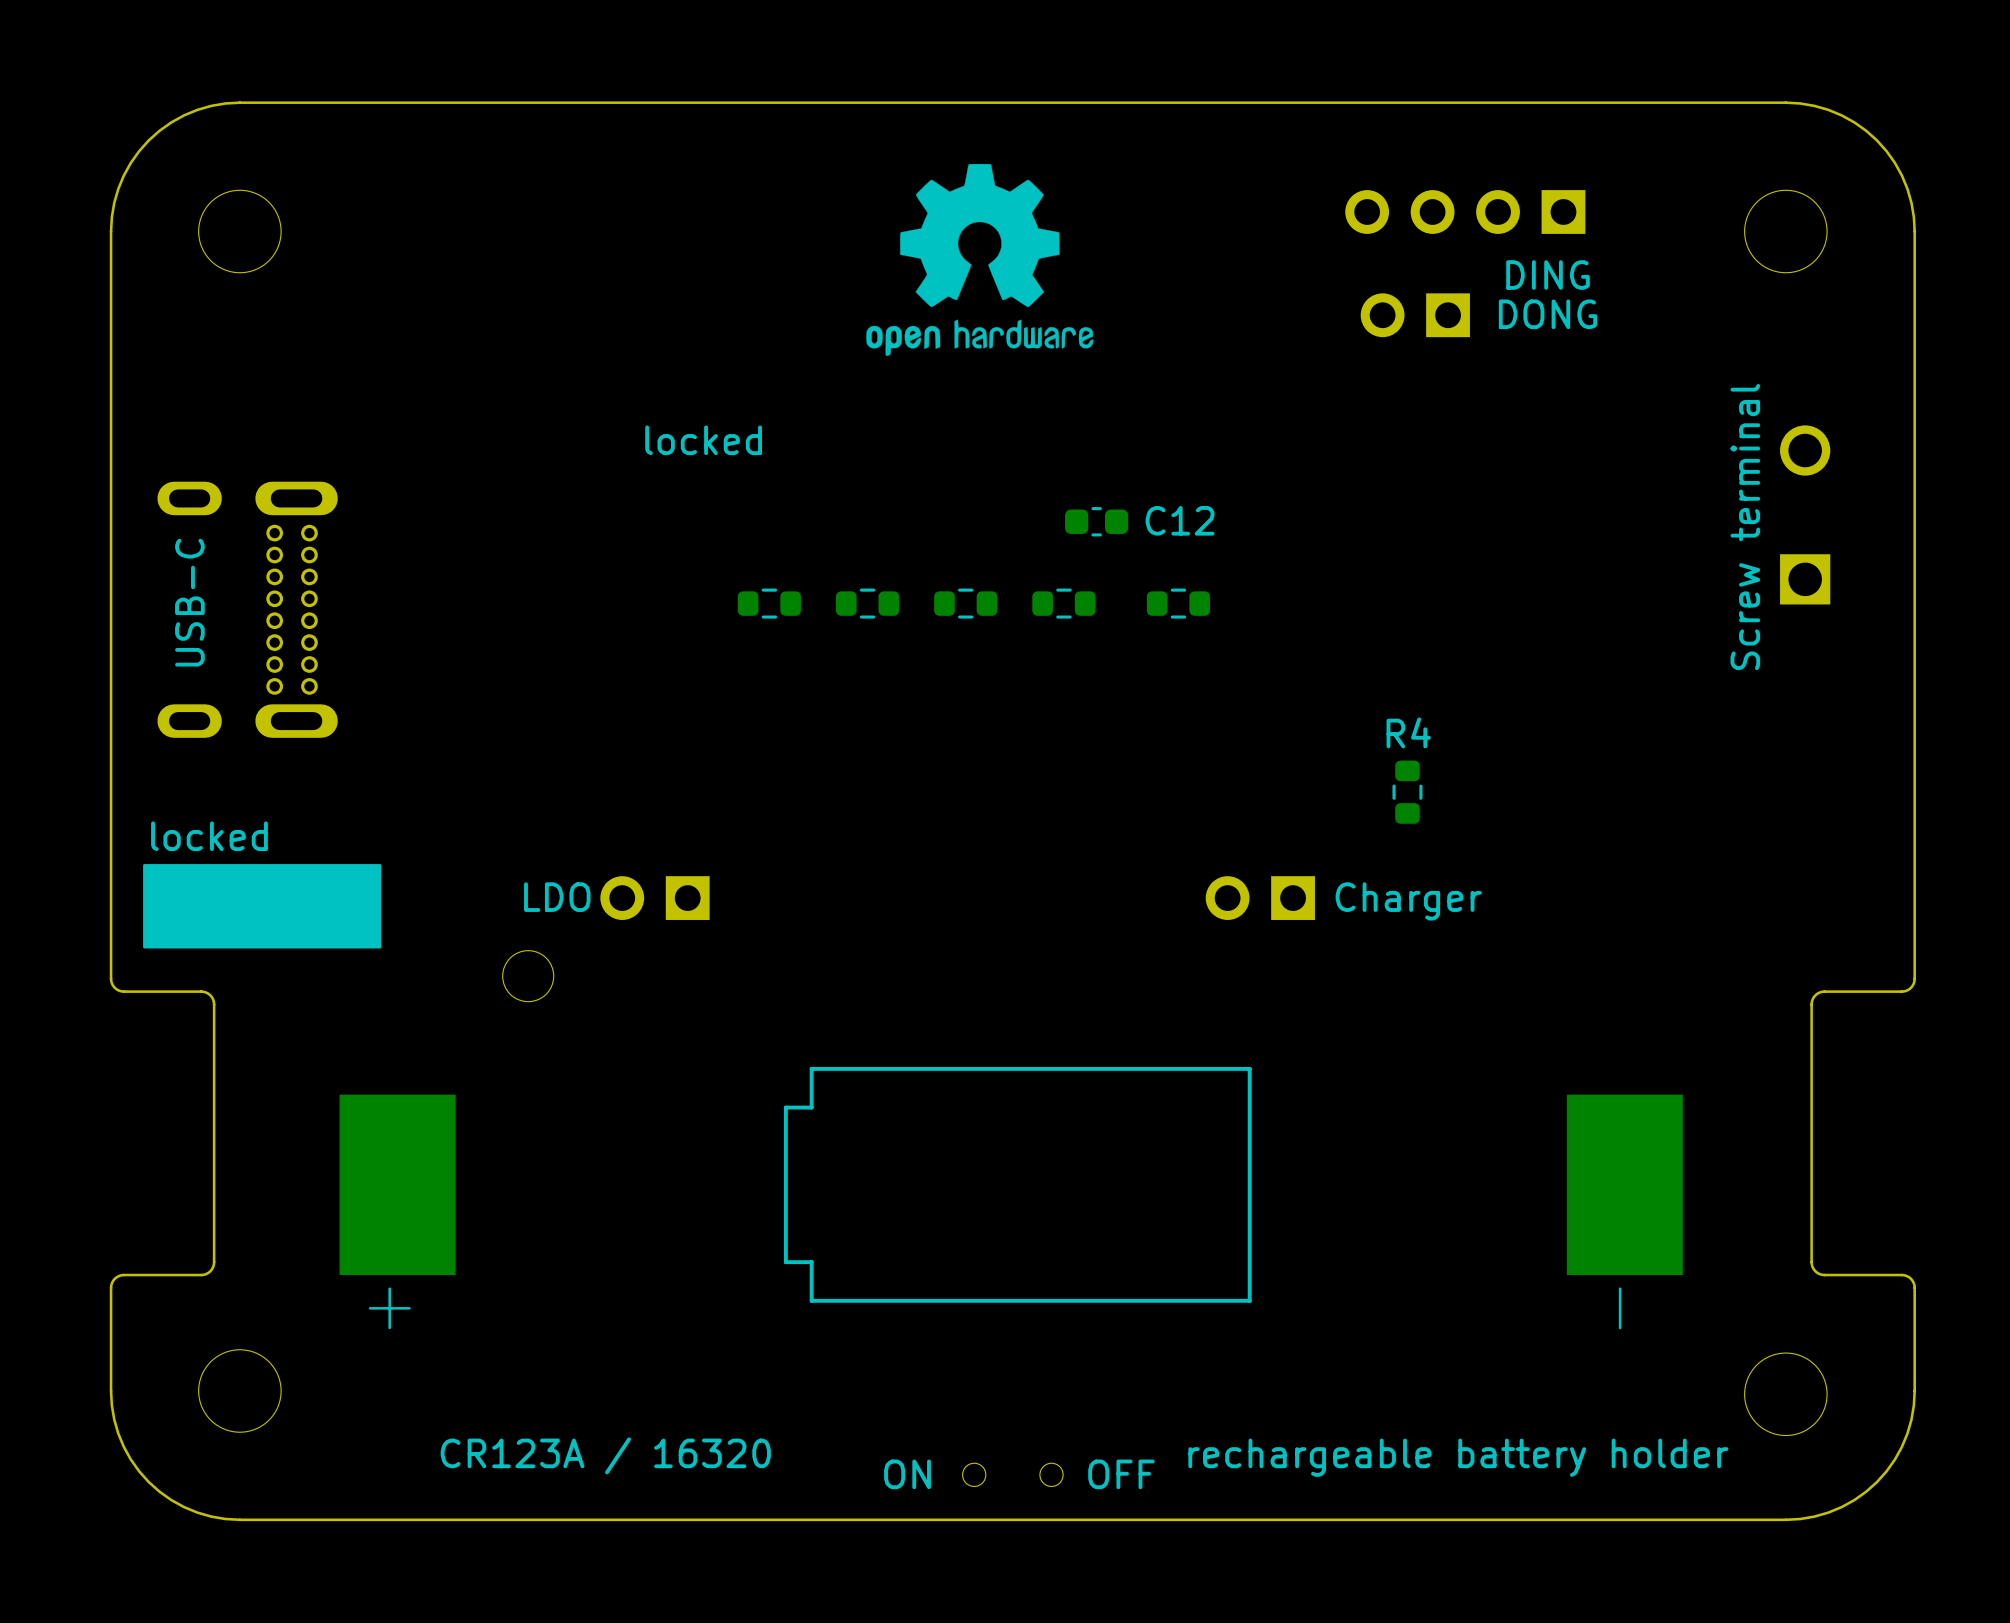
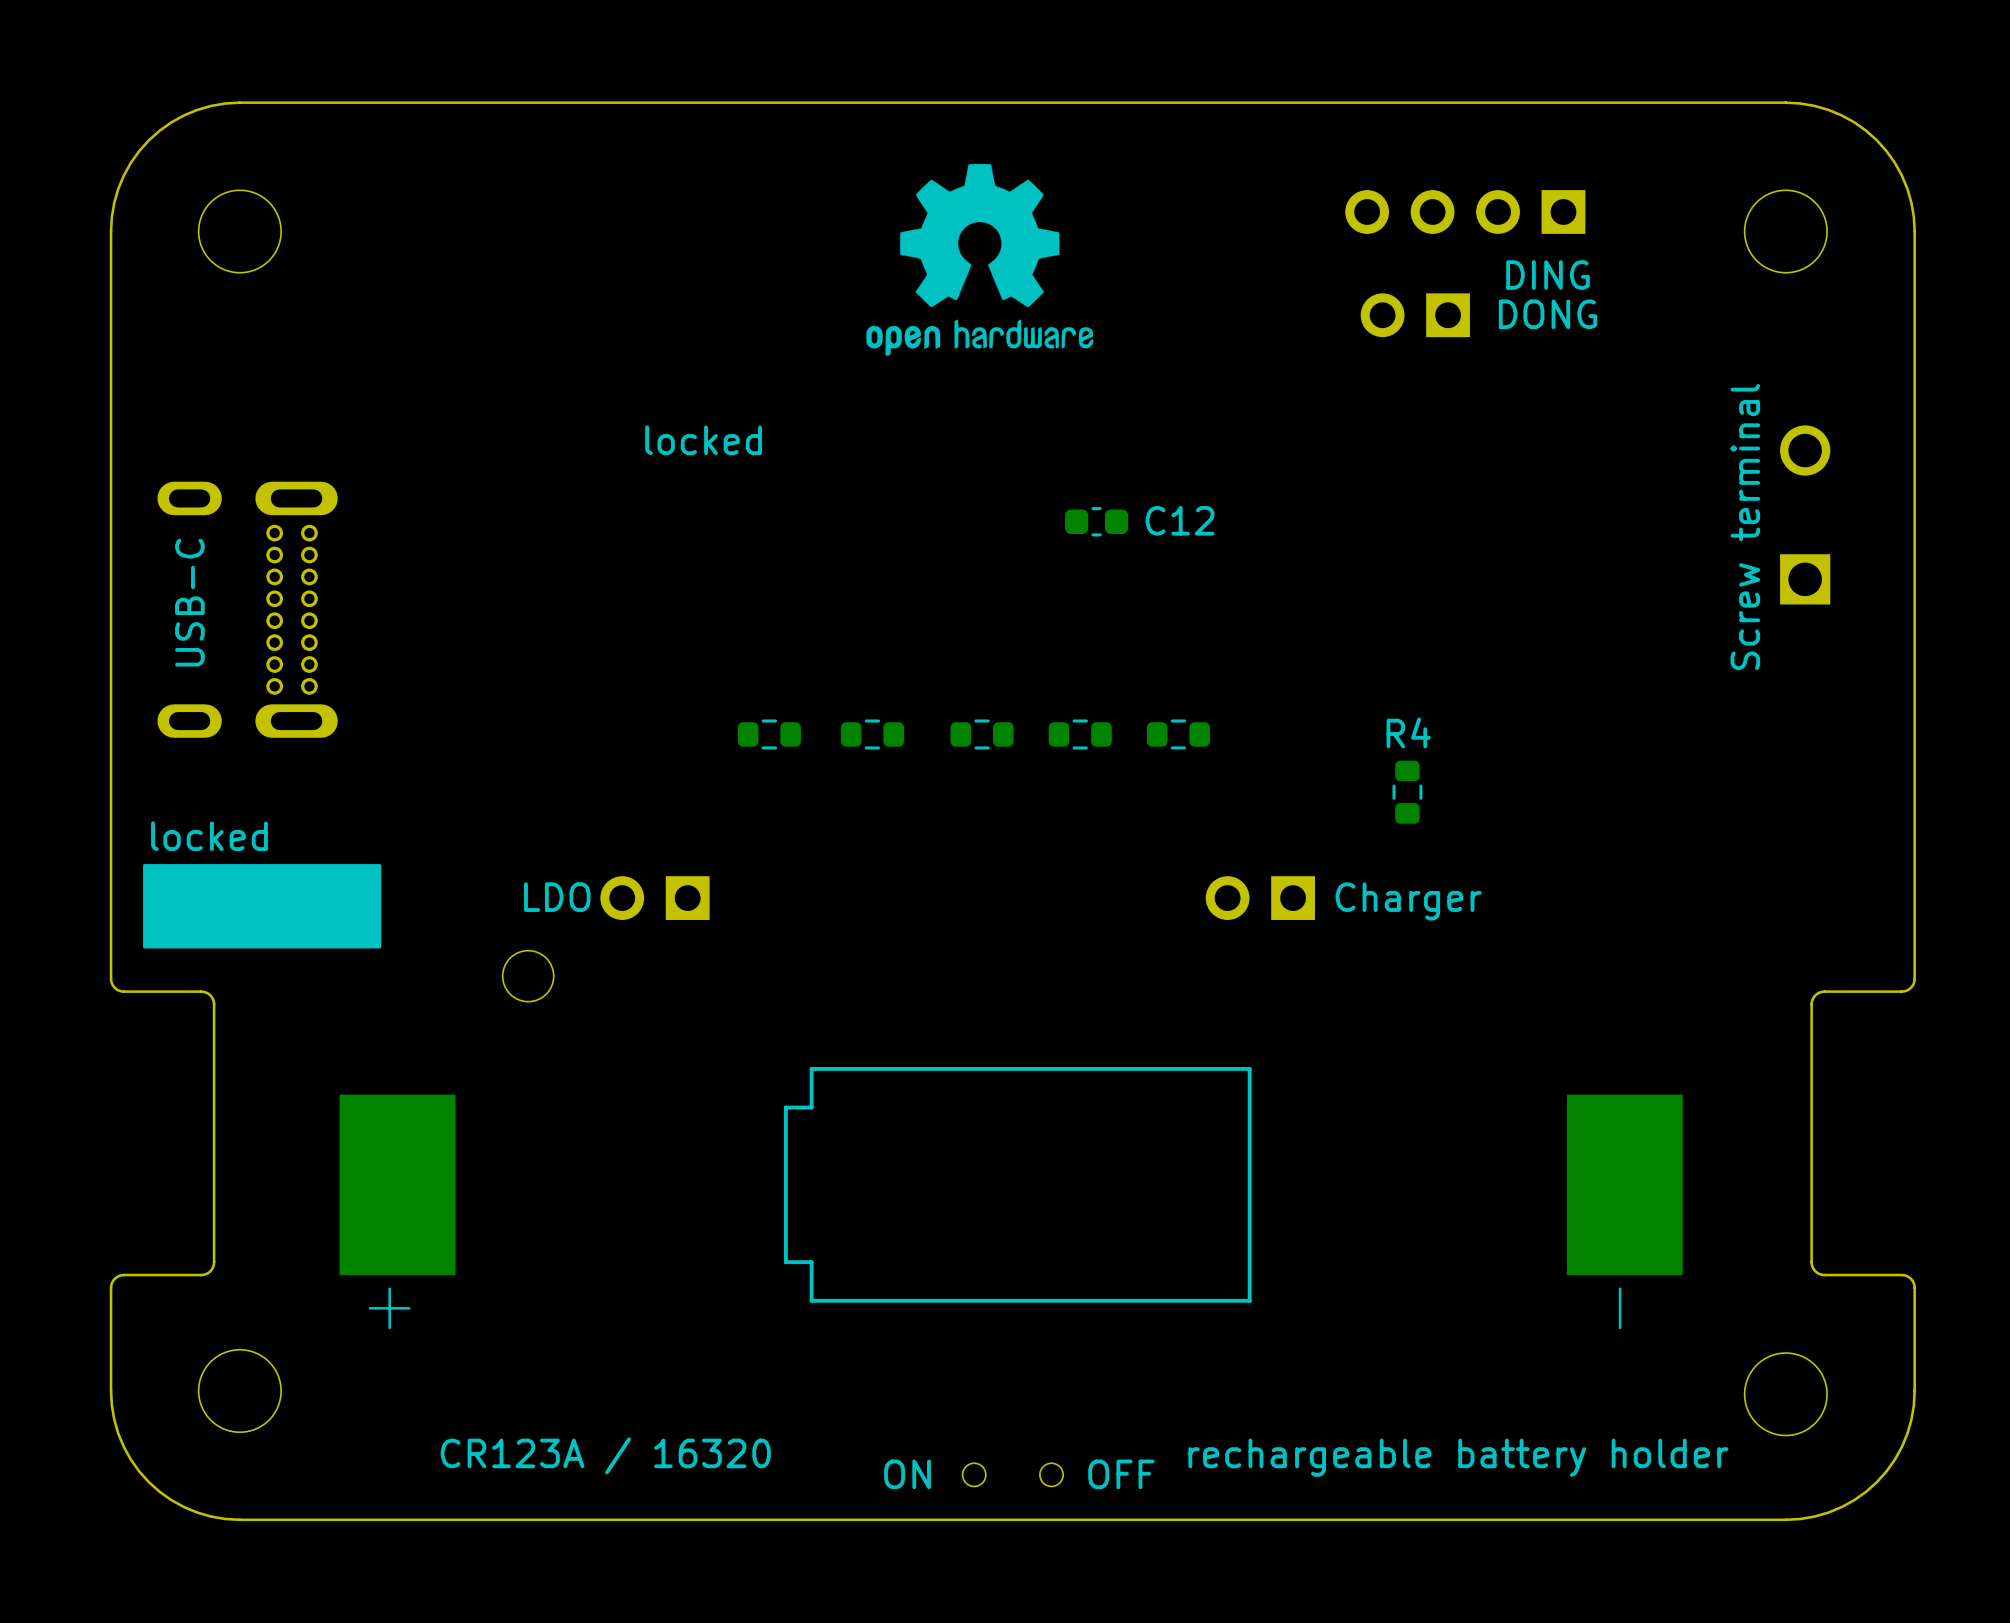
part: (769, 603) -> none
part: (867, 603) -> none
part: (965, 603) -> none
part: (1063, 603) -> none
part: (1178, 603) -> none
part: none -> (769, 734)
part: none -> (872, 734)
part: none -> (982, 734)
part: none -> (1080, 734)
part: none -> (1178, 734)

